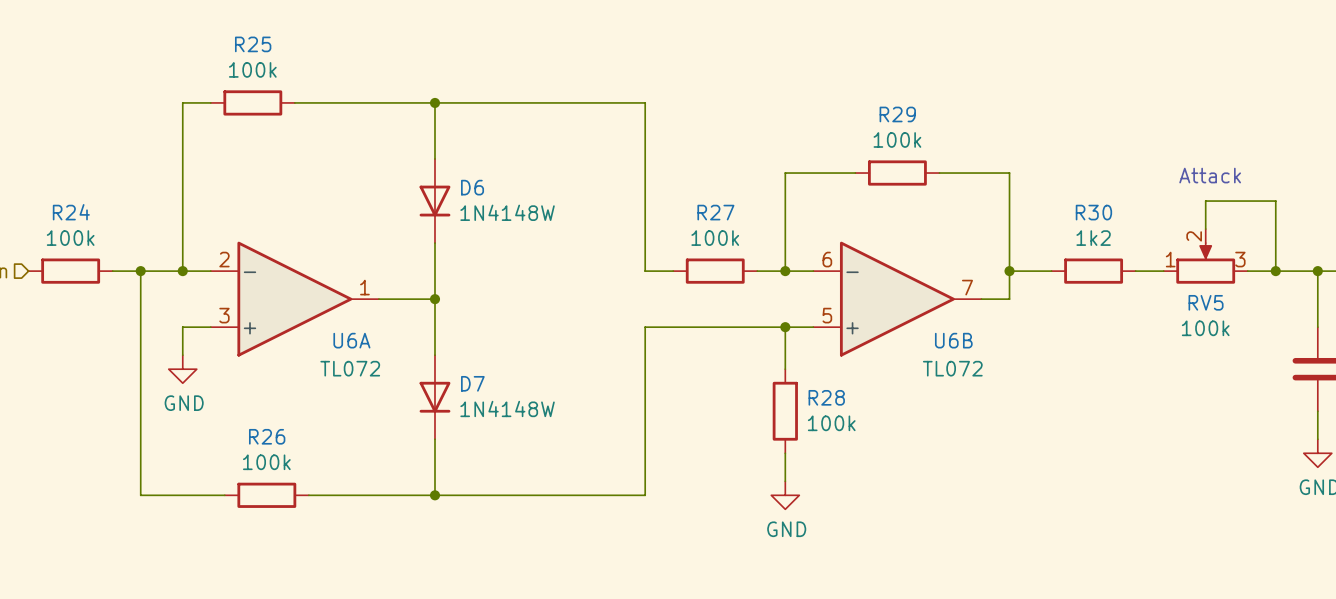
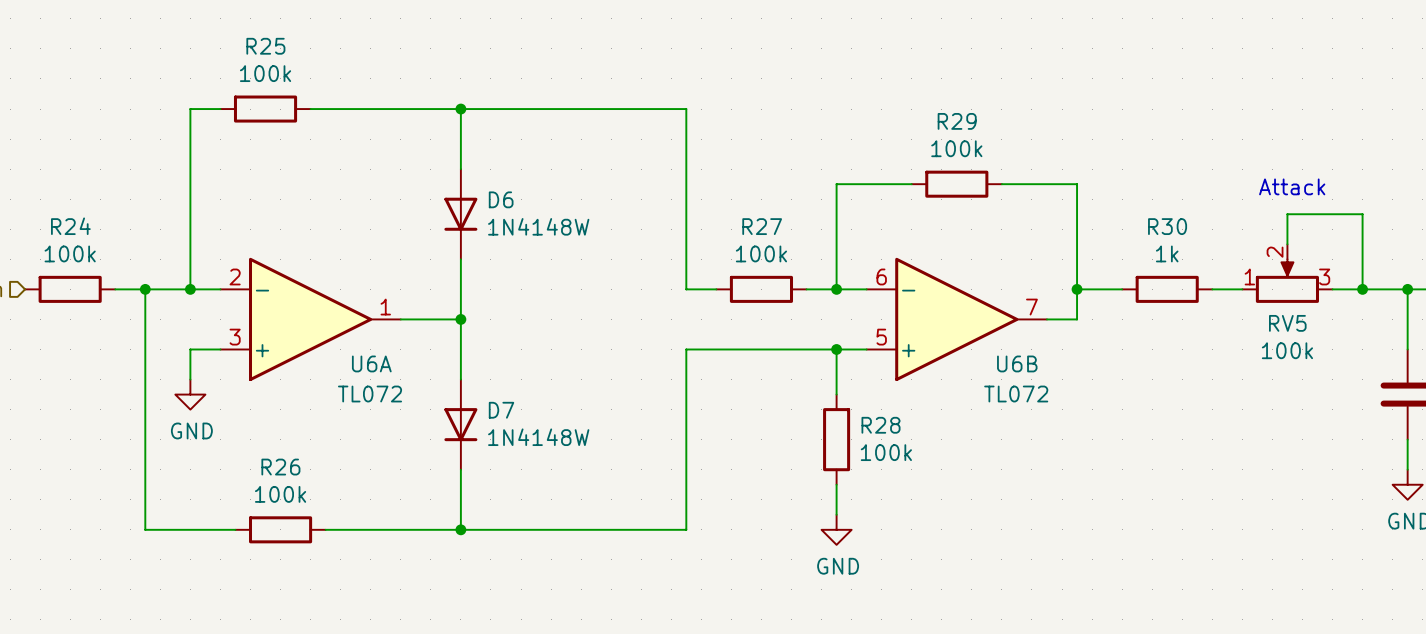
R30 value: 1k2 (1093, 238) -> 1k (1167, 253)

